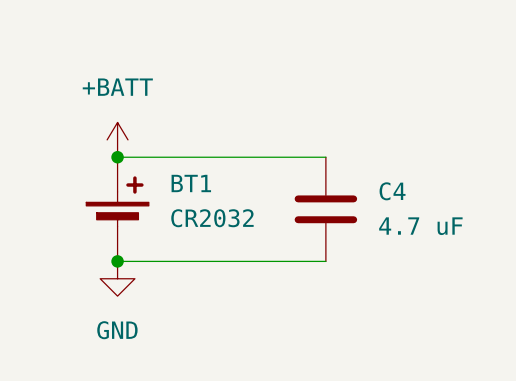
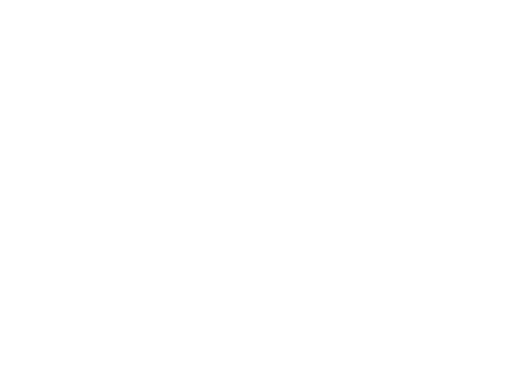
power symbol: +BATT (117, 139) -> none
wire: (117, 157) (325, 157) -> none
junction: (117, 157) -> none
BT1: CR2032 (117, 209) -> none
C4: 4.7 uF (325, 209) -> none
wire: (117, 261) (325, 261) -> none
junction: (117, 261) -> none
power symbol: GND (117, 278) -> none

